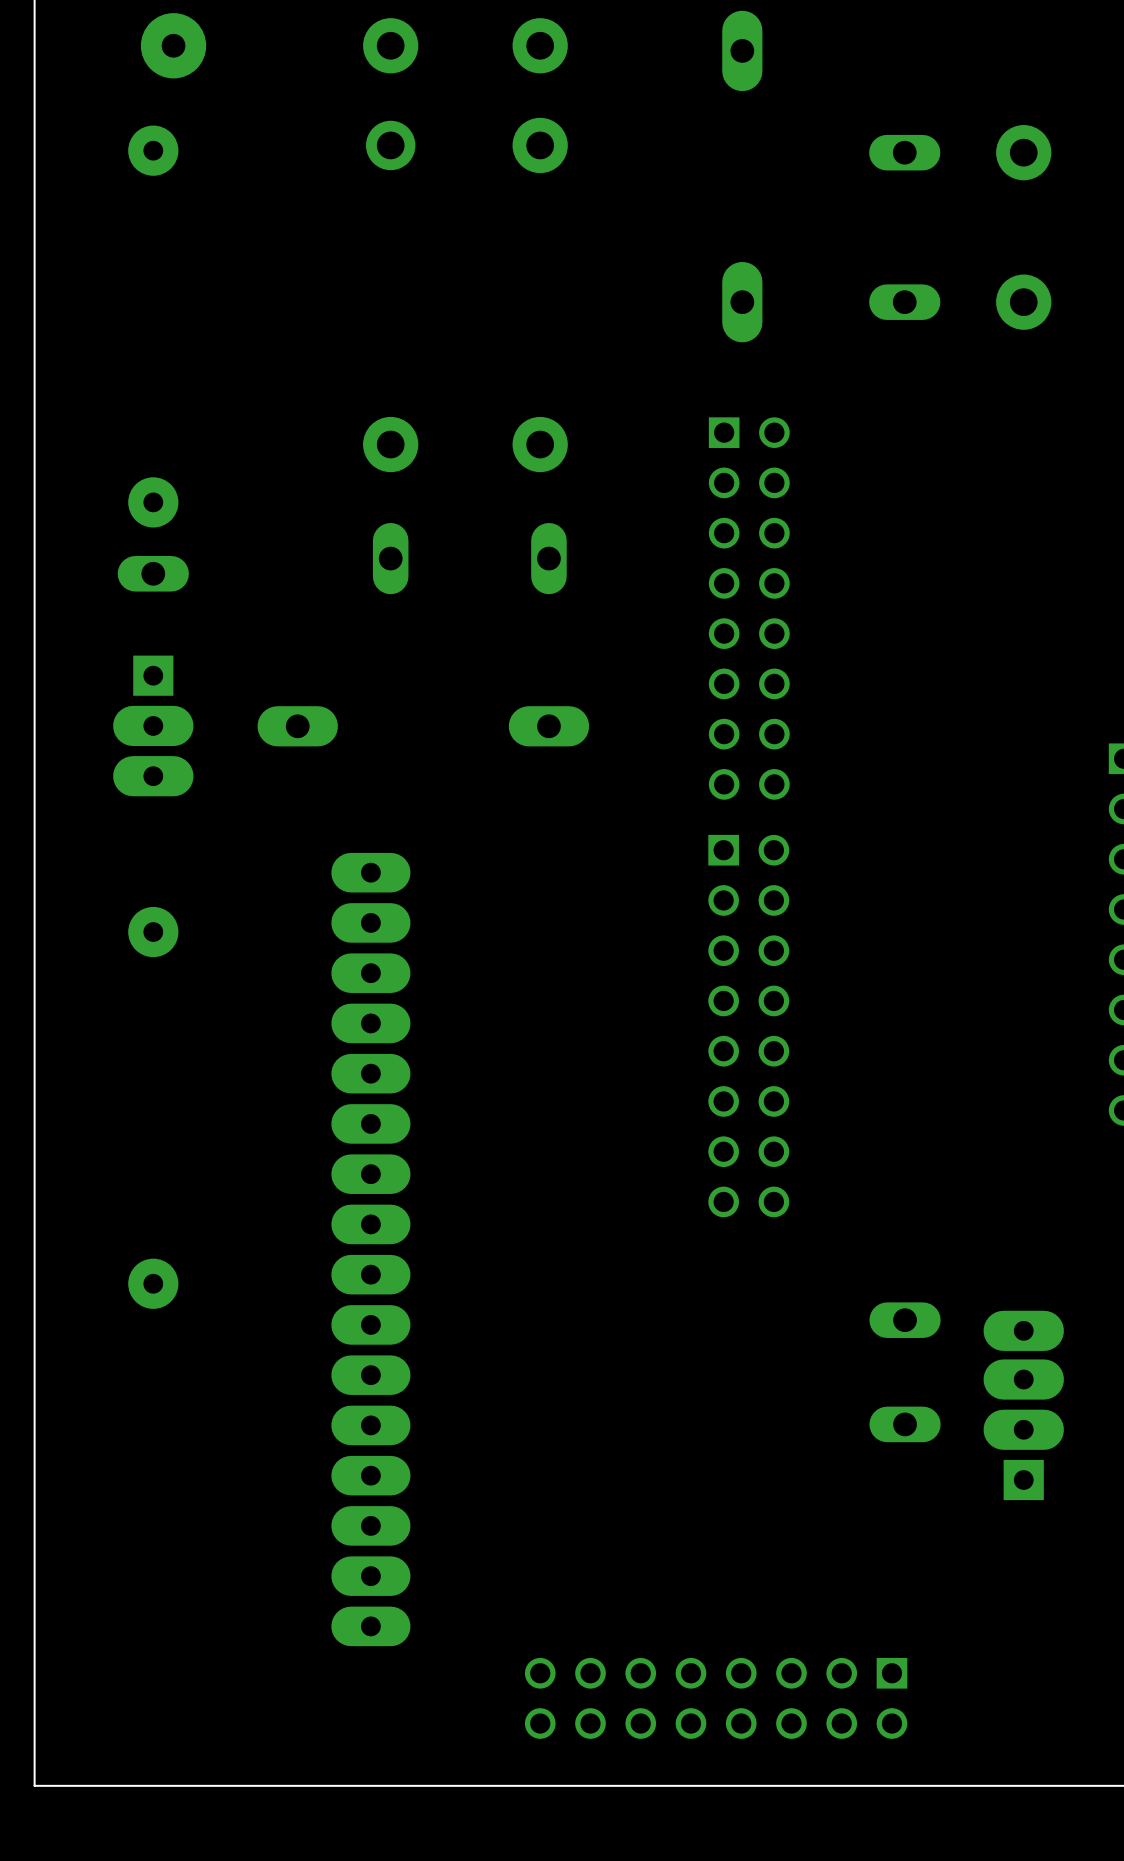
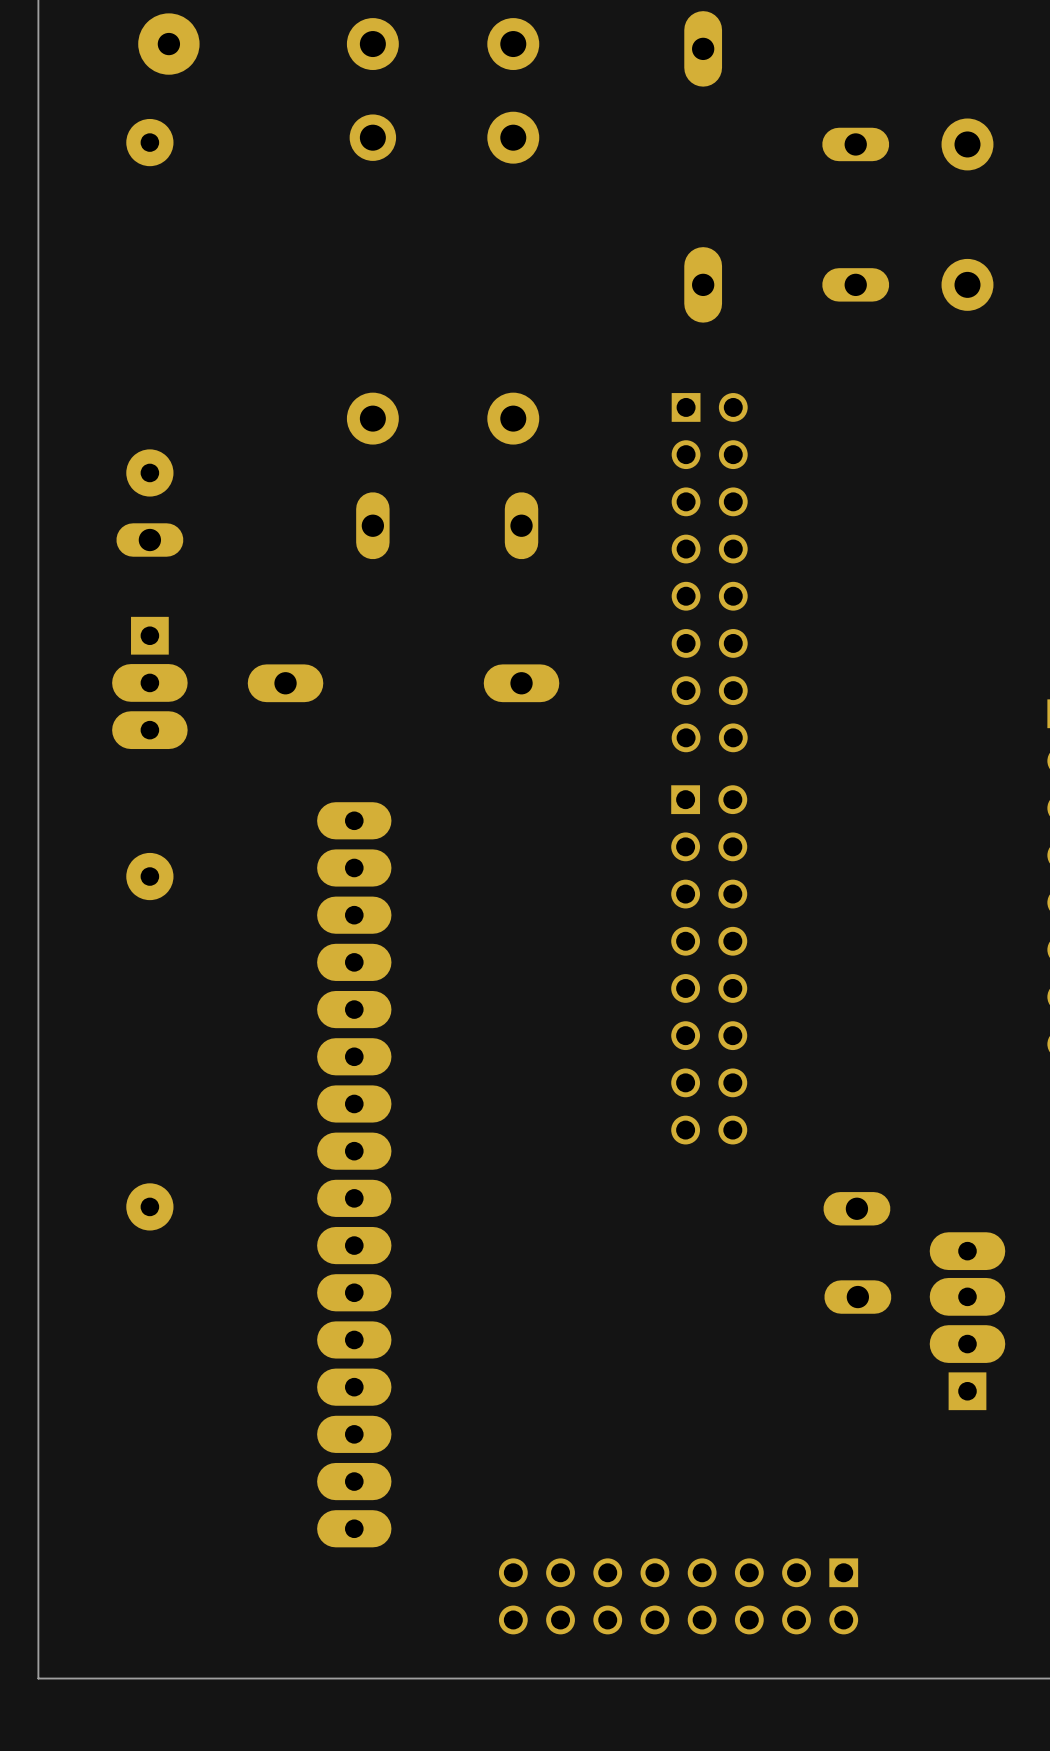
part: none -> (856, 1208)
part: (905, 1320) -> none
part: none -> (857, 1297)
part: (905, 1424) -> none

